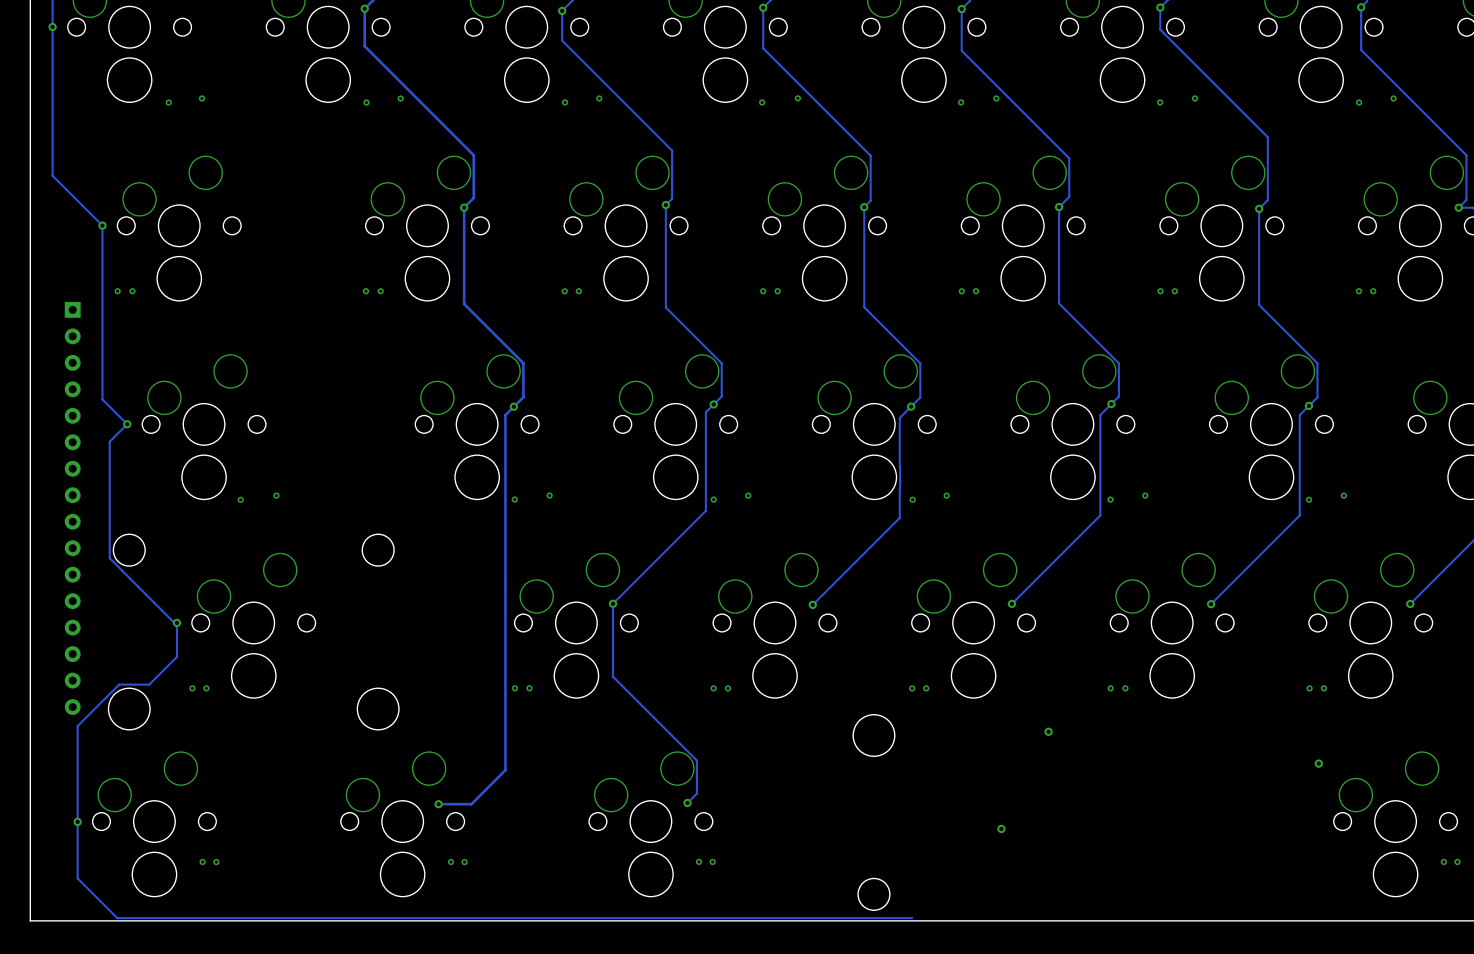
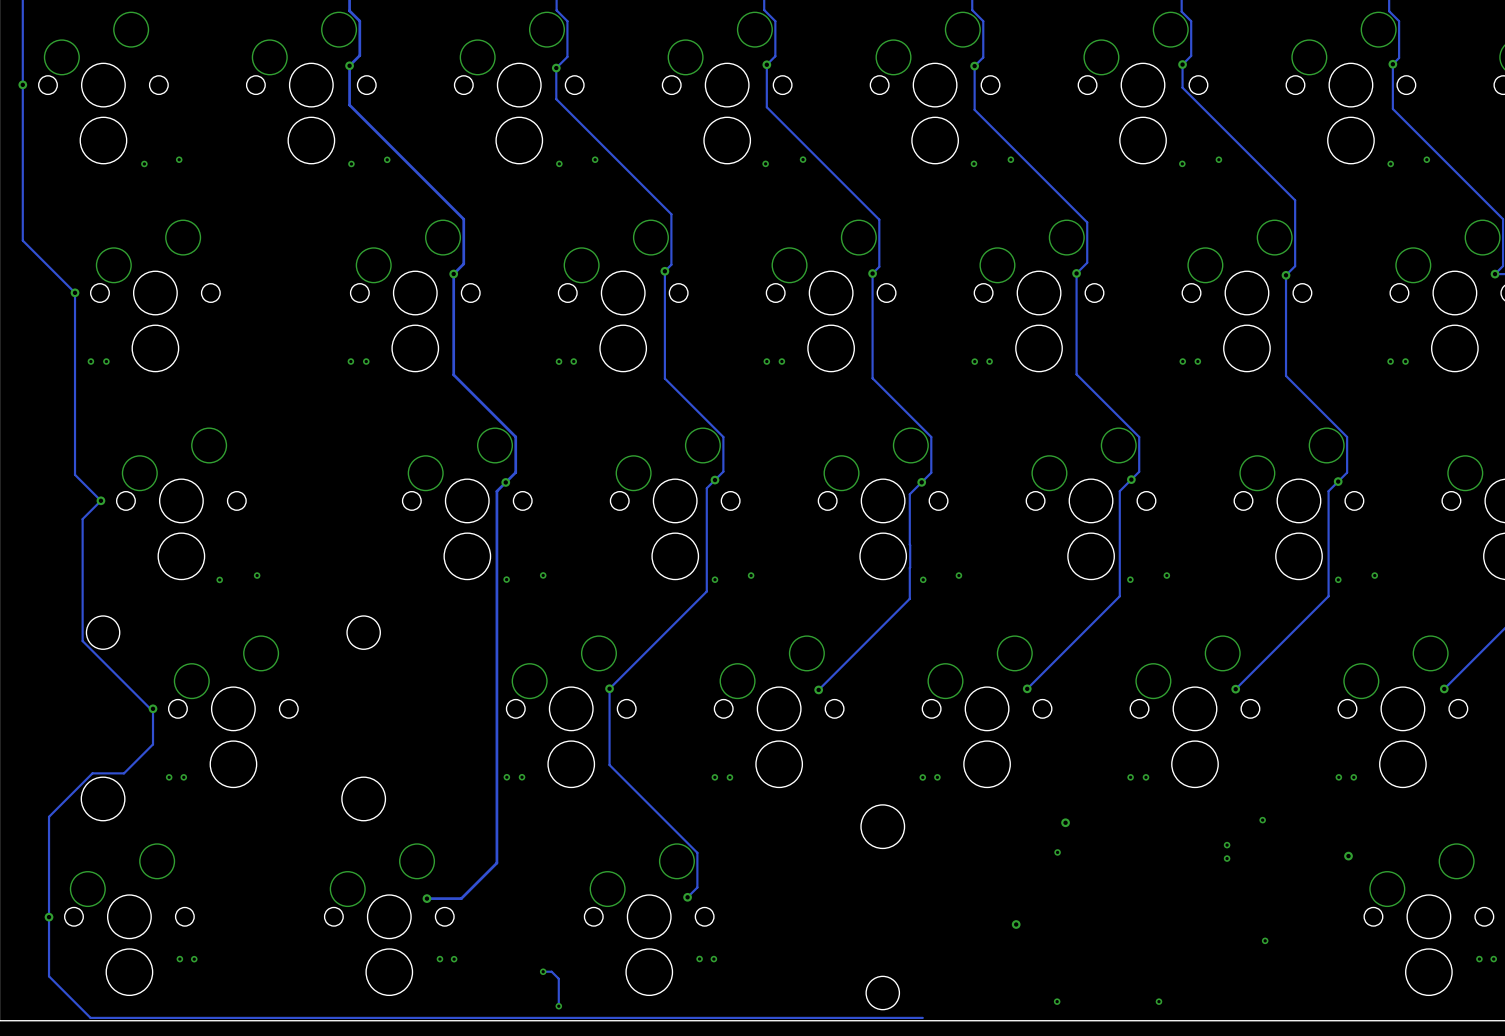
part: (72, 508) -> none
via: none -> (1262, 820)
via: none -> (1227, 845)
via: none -> (1057, 852)
via: none -> (1227, 858)
via: none -> (1265, 940)
track: none -> (543, 971) (551, 971) (558, 978) (558, 1006)
via: none -> (543, 971)
via: none -> (1057, 1001)
via: none -> (1158, 1001)
via: none -> (558, 1006)

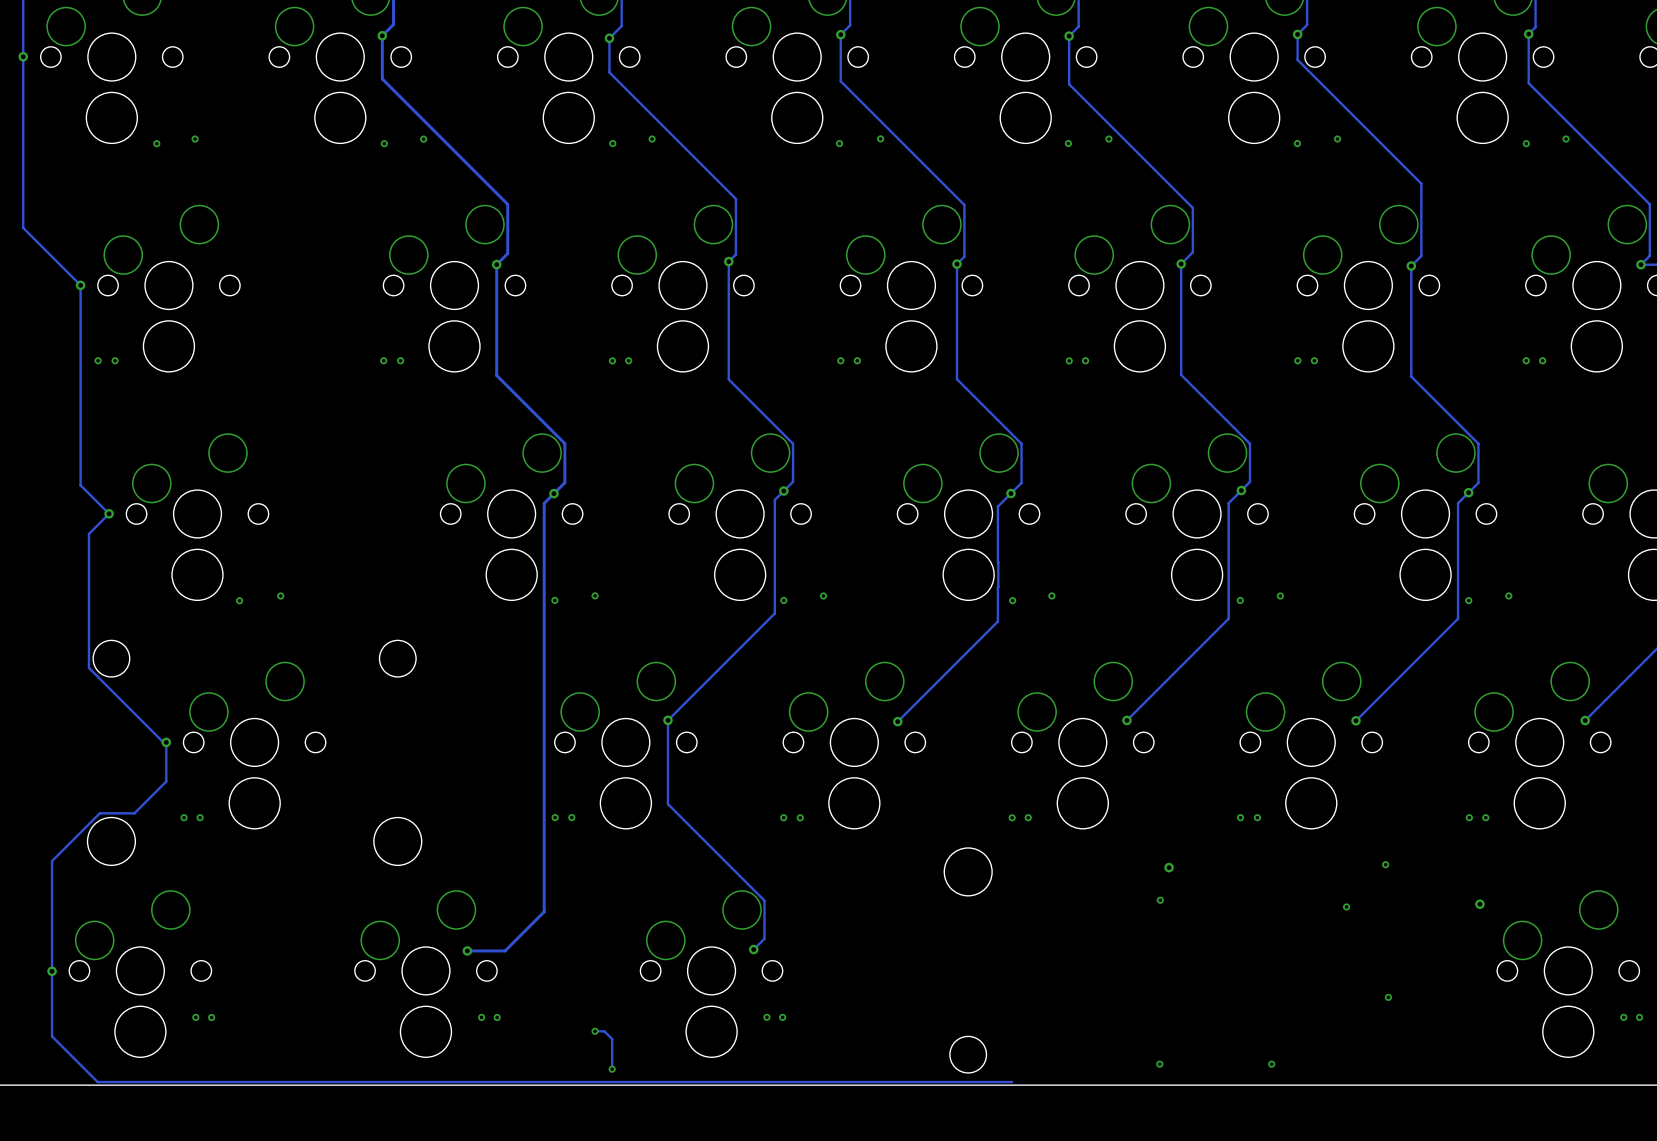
via: (1227, 845) -> none
via: (1016, 924) -> none

